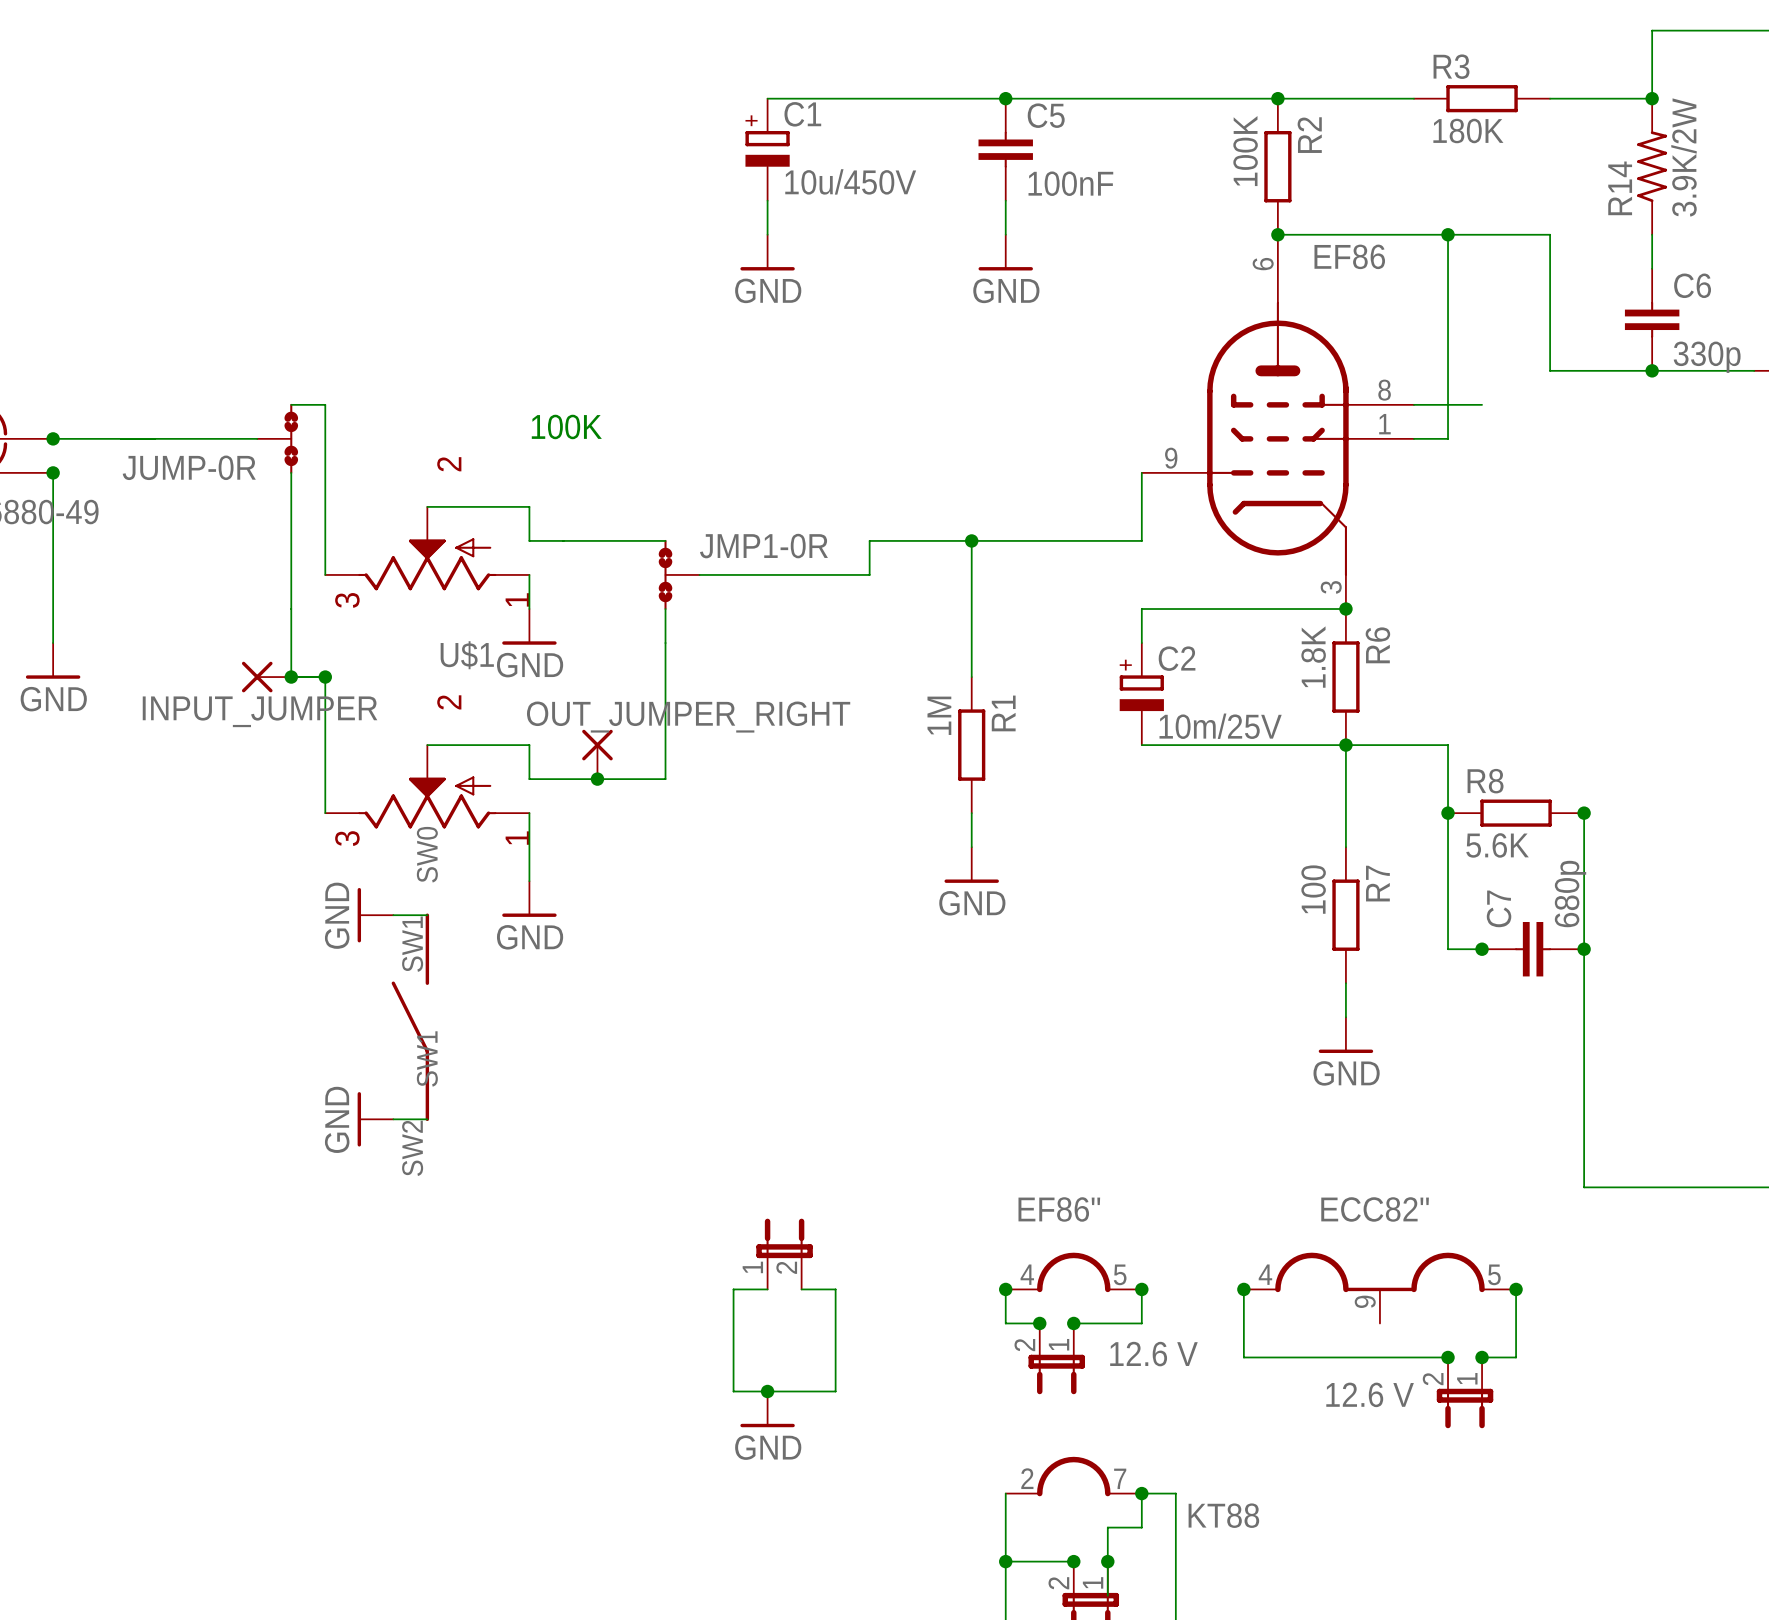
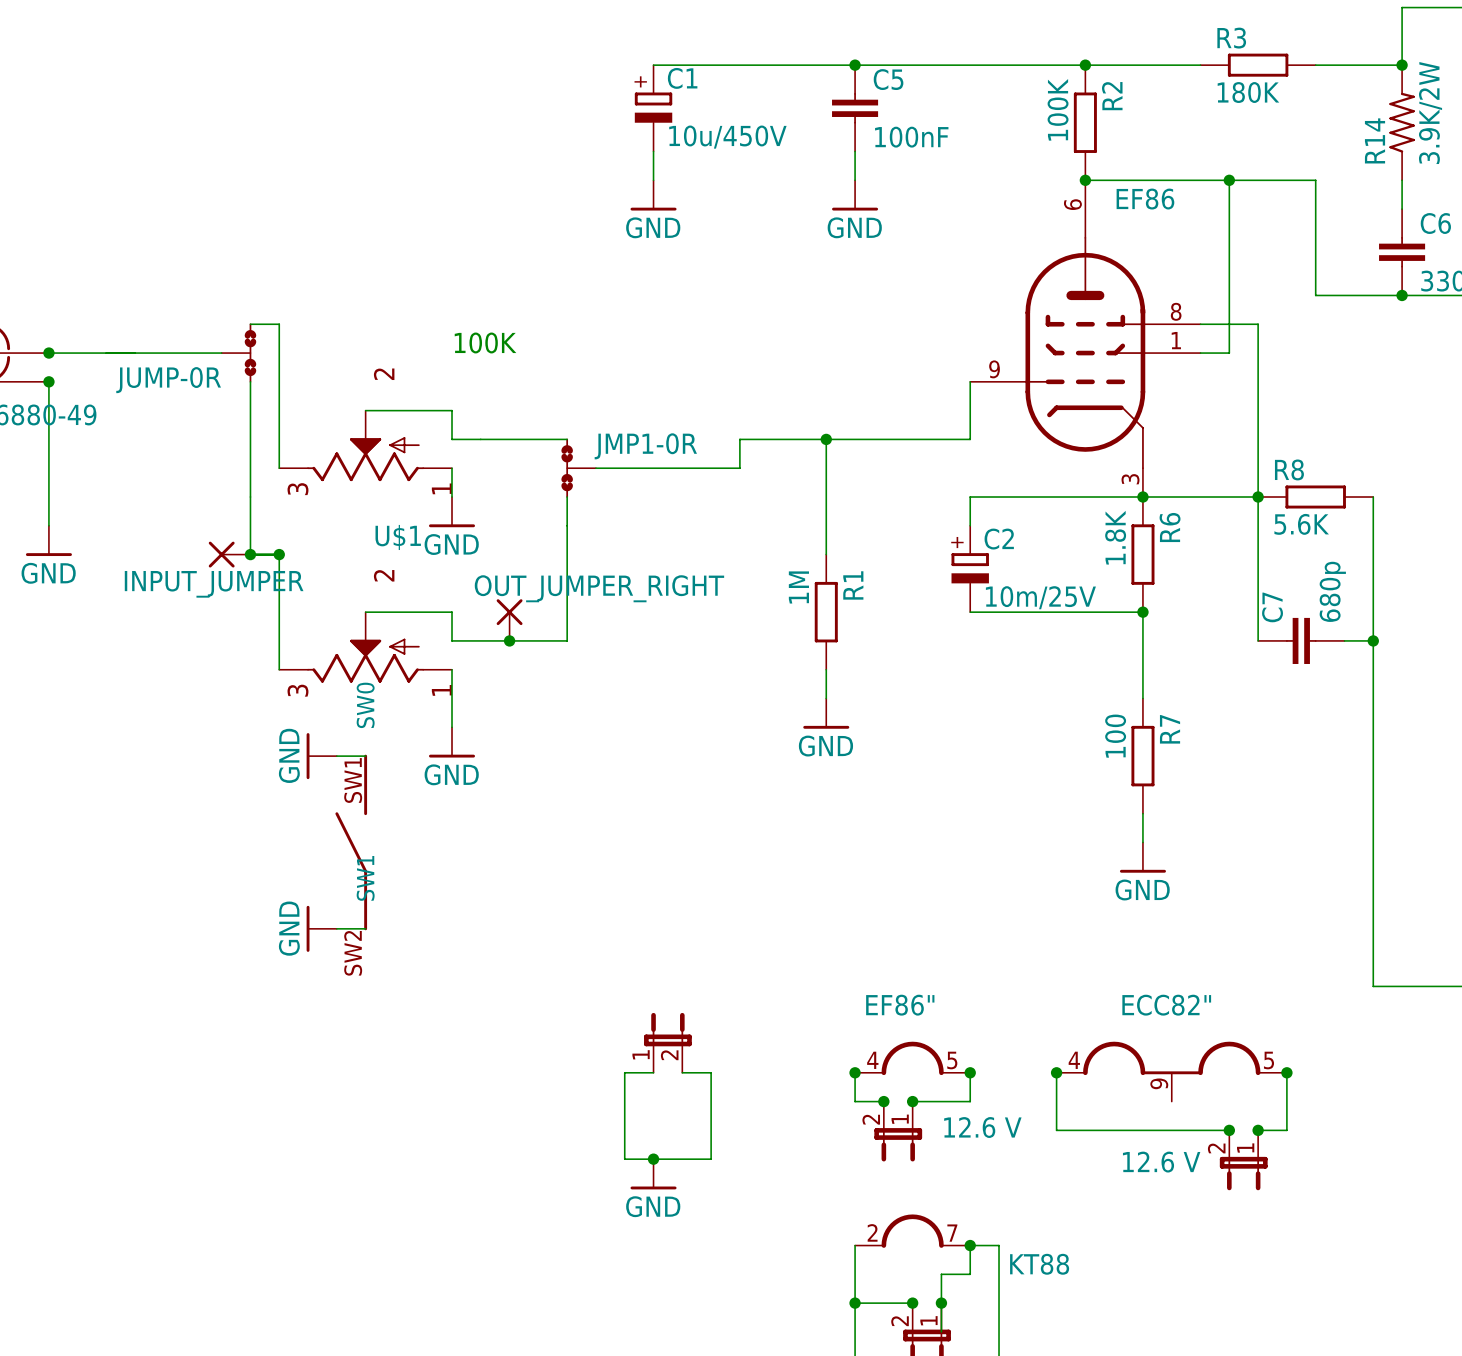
wire: none -> (1258, 324) (1258, 640)
wire: none -> (1142, 497) (1258, 497)
junction: none -> (1258, 497)
wire: (1345, 745) (1448, 745) (1448, 949) (1482, 949) -> none
wire: none -> (1344, 640) (1373, 640)
junction: (1448, 813) -> none
R8 position: (1516, 813) -> (1315, 497)
wire: (1584, 813) (1584, 1187) (1618, 1187) -> (1373, 497) (1373, 986)
junction position: (1584, 813) -> (1373, 640)
junction: (1482, 949) -> none
C7 position: (1533, 949) -> (1301, 640)
junction: (1584, 949) -> none

